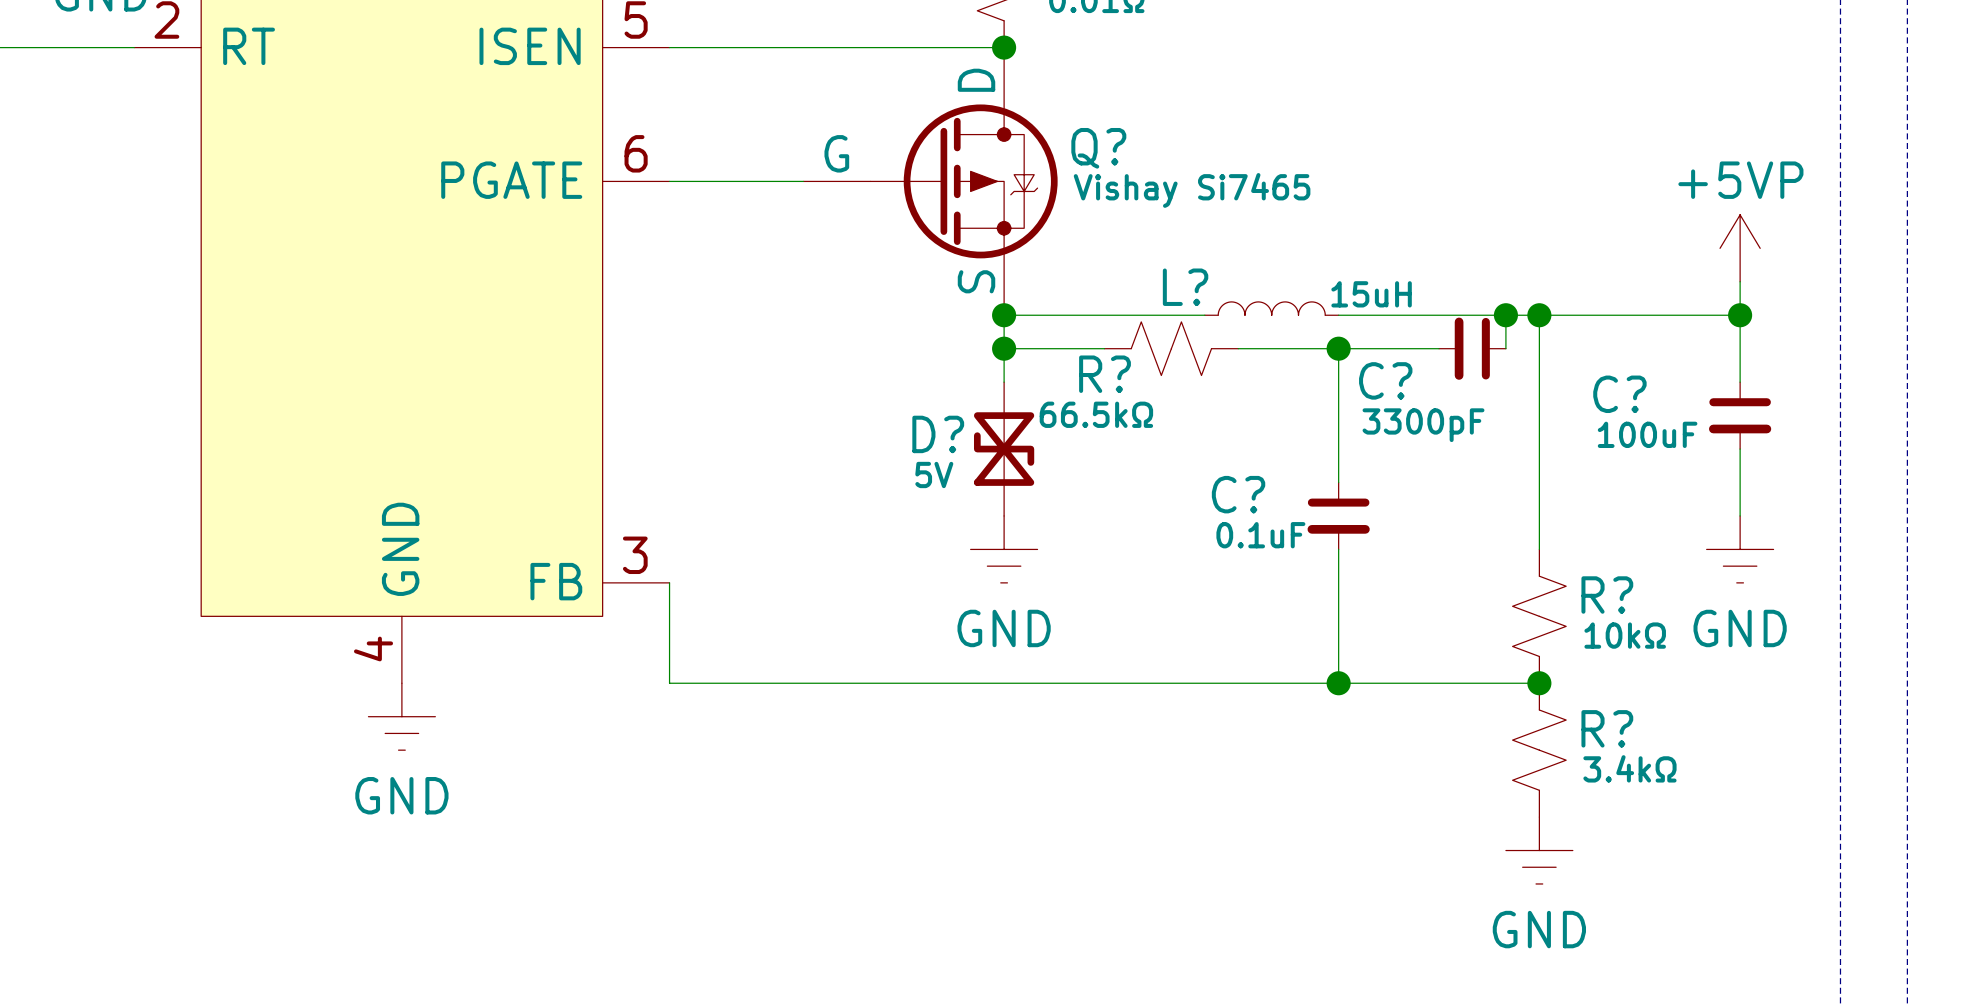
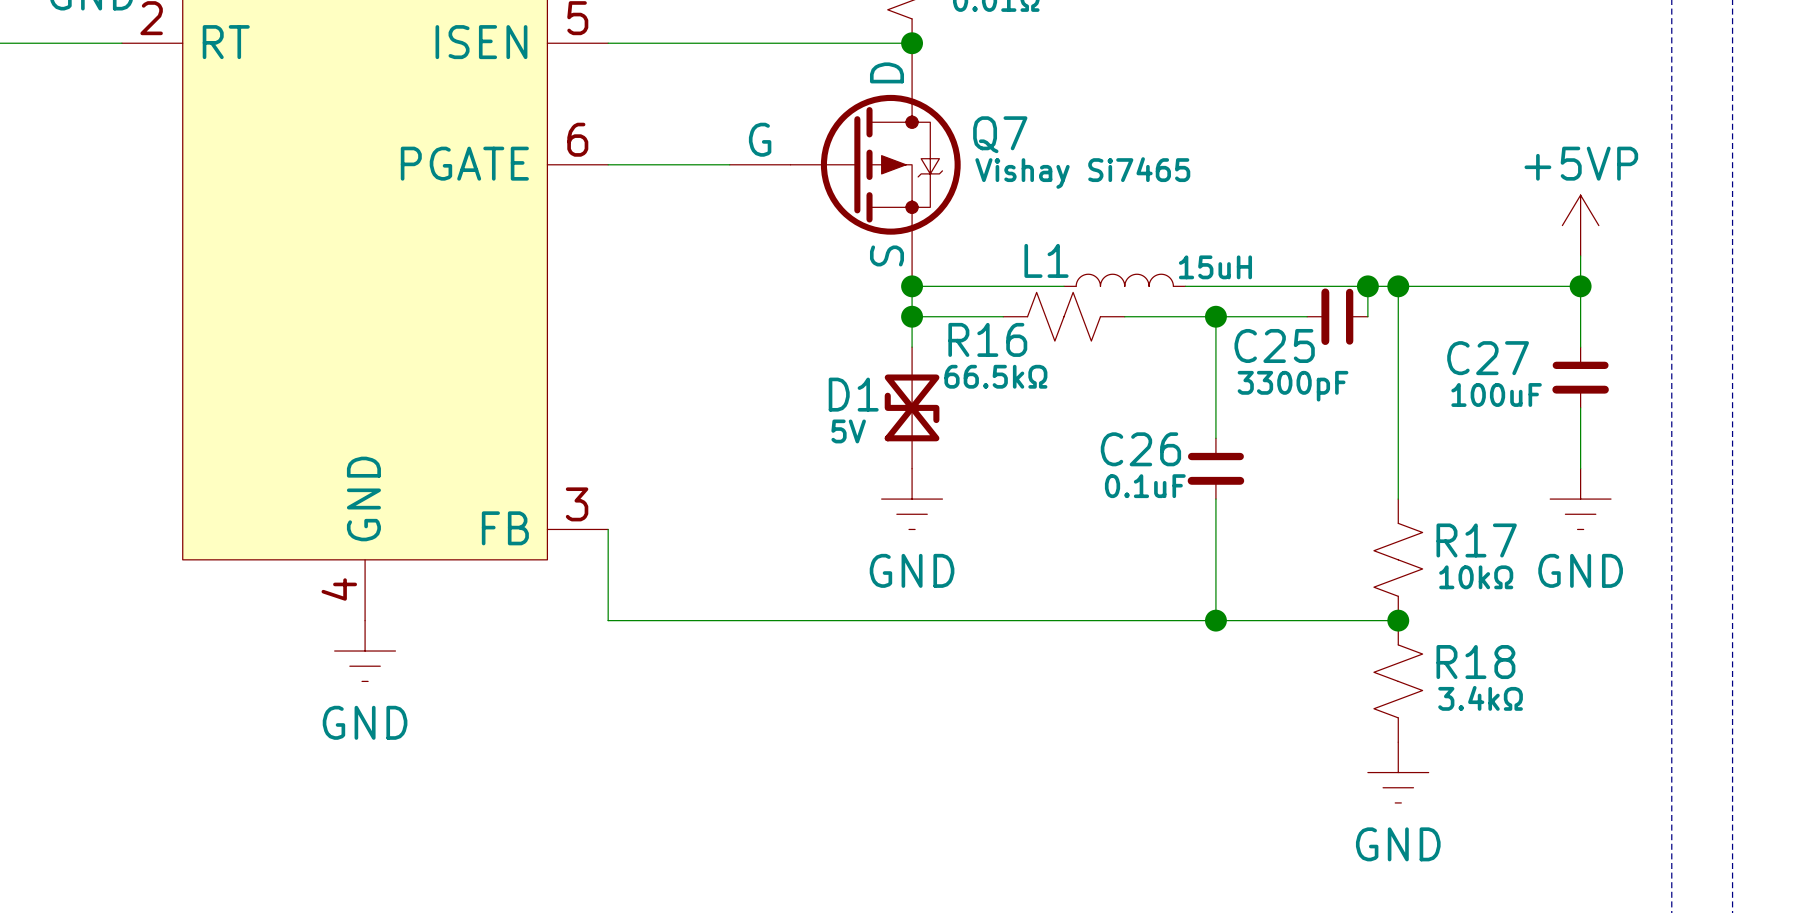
Q? name: Q? (1098, 148) -> Q7 (1000, 134)
L1: none -> 15uH (1124, 280)
L?: 15uH (1271, 308) -> none
wire: (1171, 315) (1204, 315) -> (1185, 286) (1215, 286)
R? name: R? (1105, 374) -> R16 (987, 339)
C? name: C? (1385, 380) -> C25 (1274, 345)
C? name: C? (1619, 394) -> C27 (1488, 358)
D? name: D? (938, 434) -> D1 (853, 394)
C? name: C? (1238, 494) -> C26 (1140, 449)
R? name: R? (1607, 595) -> R17 (1476, 540)
R? name: R? (1607, 728) -> R18 (1475, 662)

